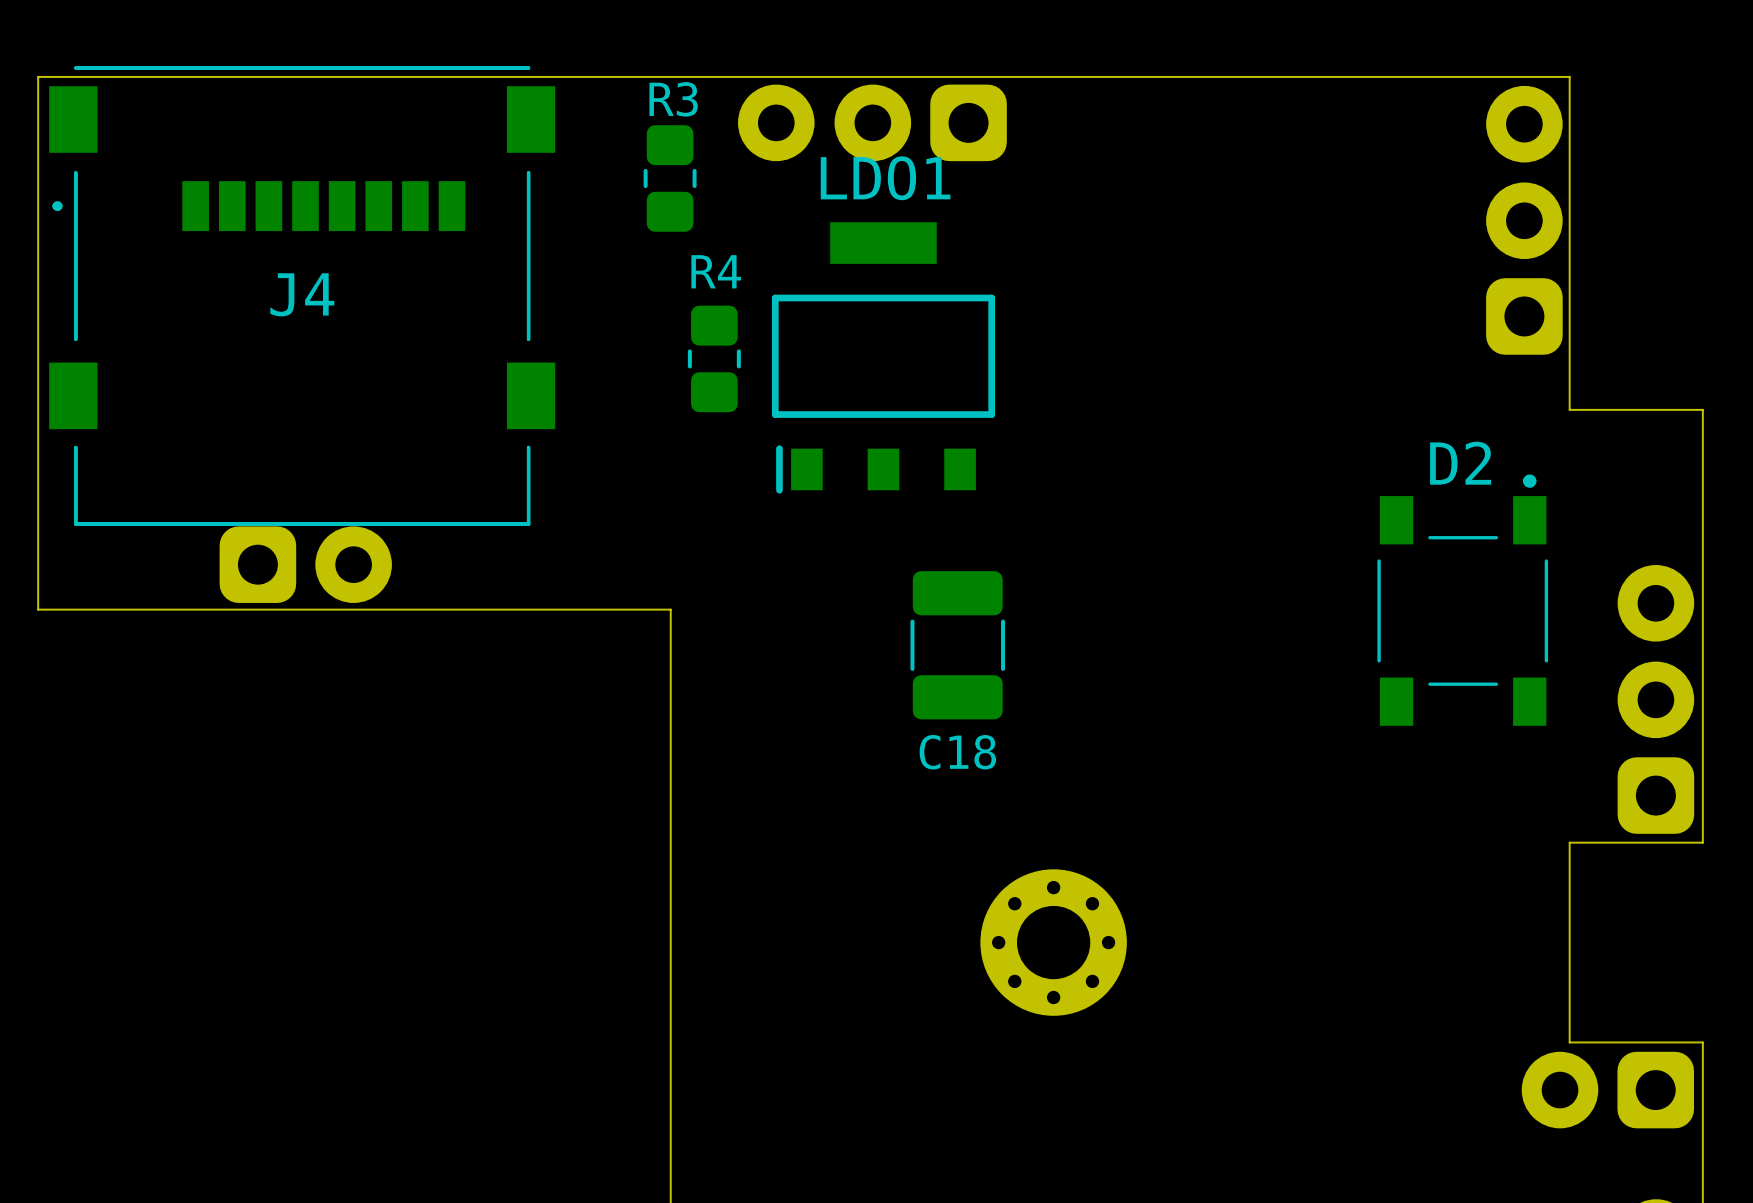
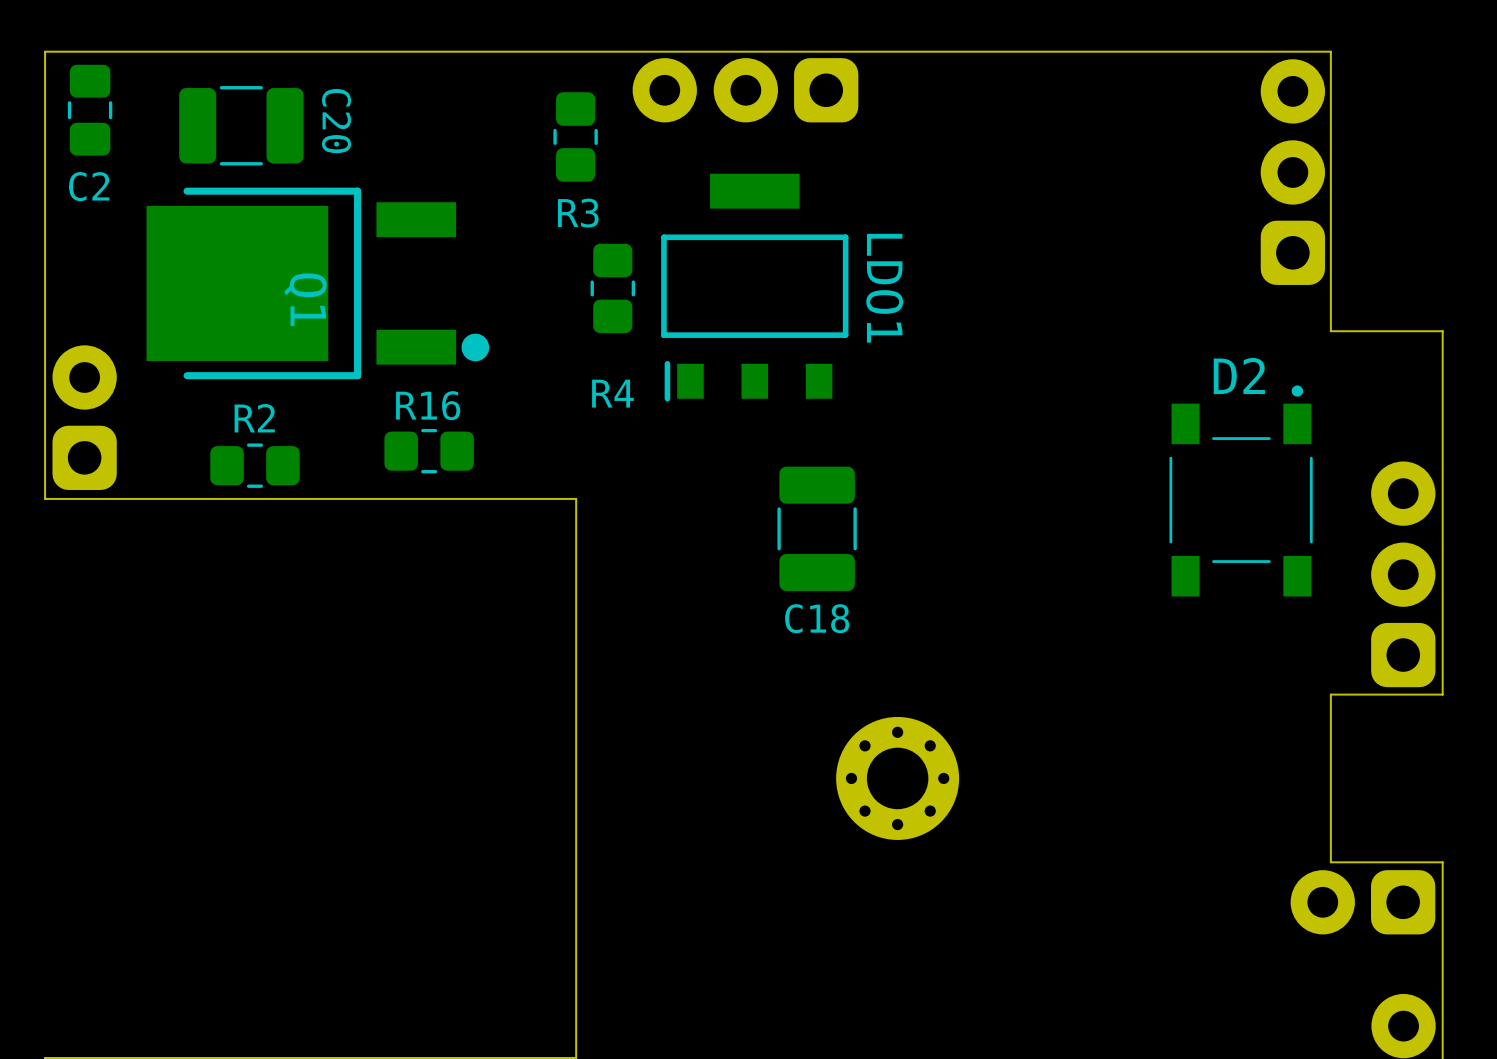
R3 name position: R3 (673, 99) -> R3 (578, 213)
C2: none -> (90, 110)
C20: none -> (241, 125)
LDO1 name rotation: 0° (885, 178) -> 90° clockwise (884, 288)
LDO1 name position: LDO1 (885, 178) -> LDO1 (884, 288)
R4 name position: R4 (716, 271) -> R4 (612, 393)
J4: (302, 296) -> none
Q1: none -> (317, 283)
R16: none -> (429, 451)
part rotation: 0° (305, 564) -> 90° counterclockwise (84, 417)
part position: (305, 564) -> (84, 417)
R2: none -> (254, 465)

